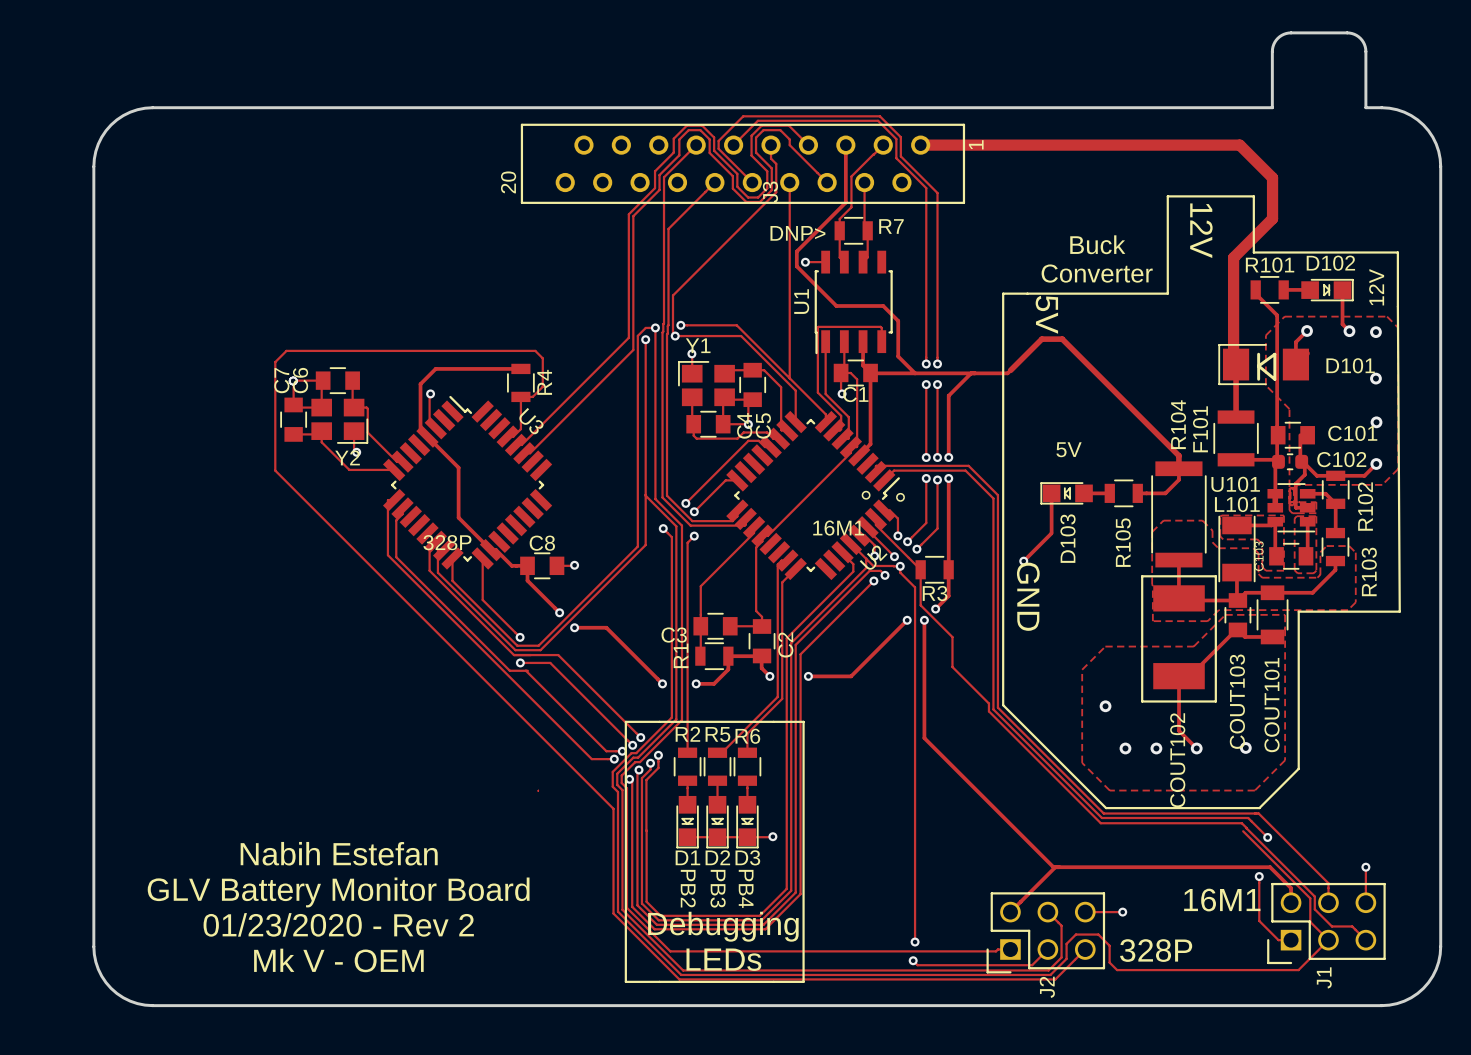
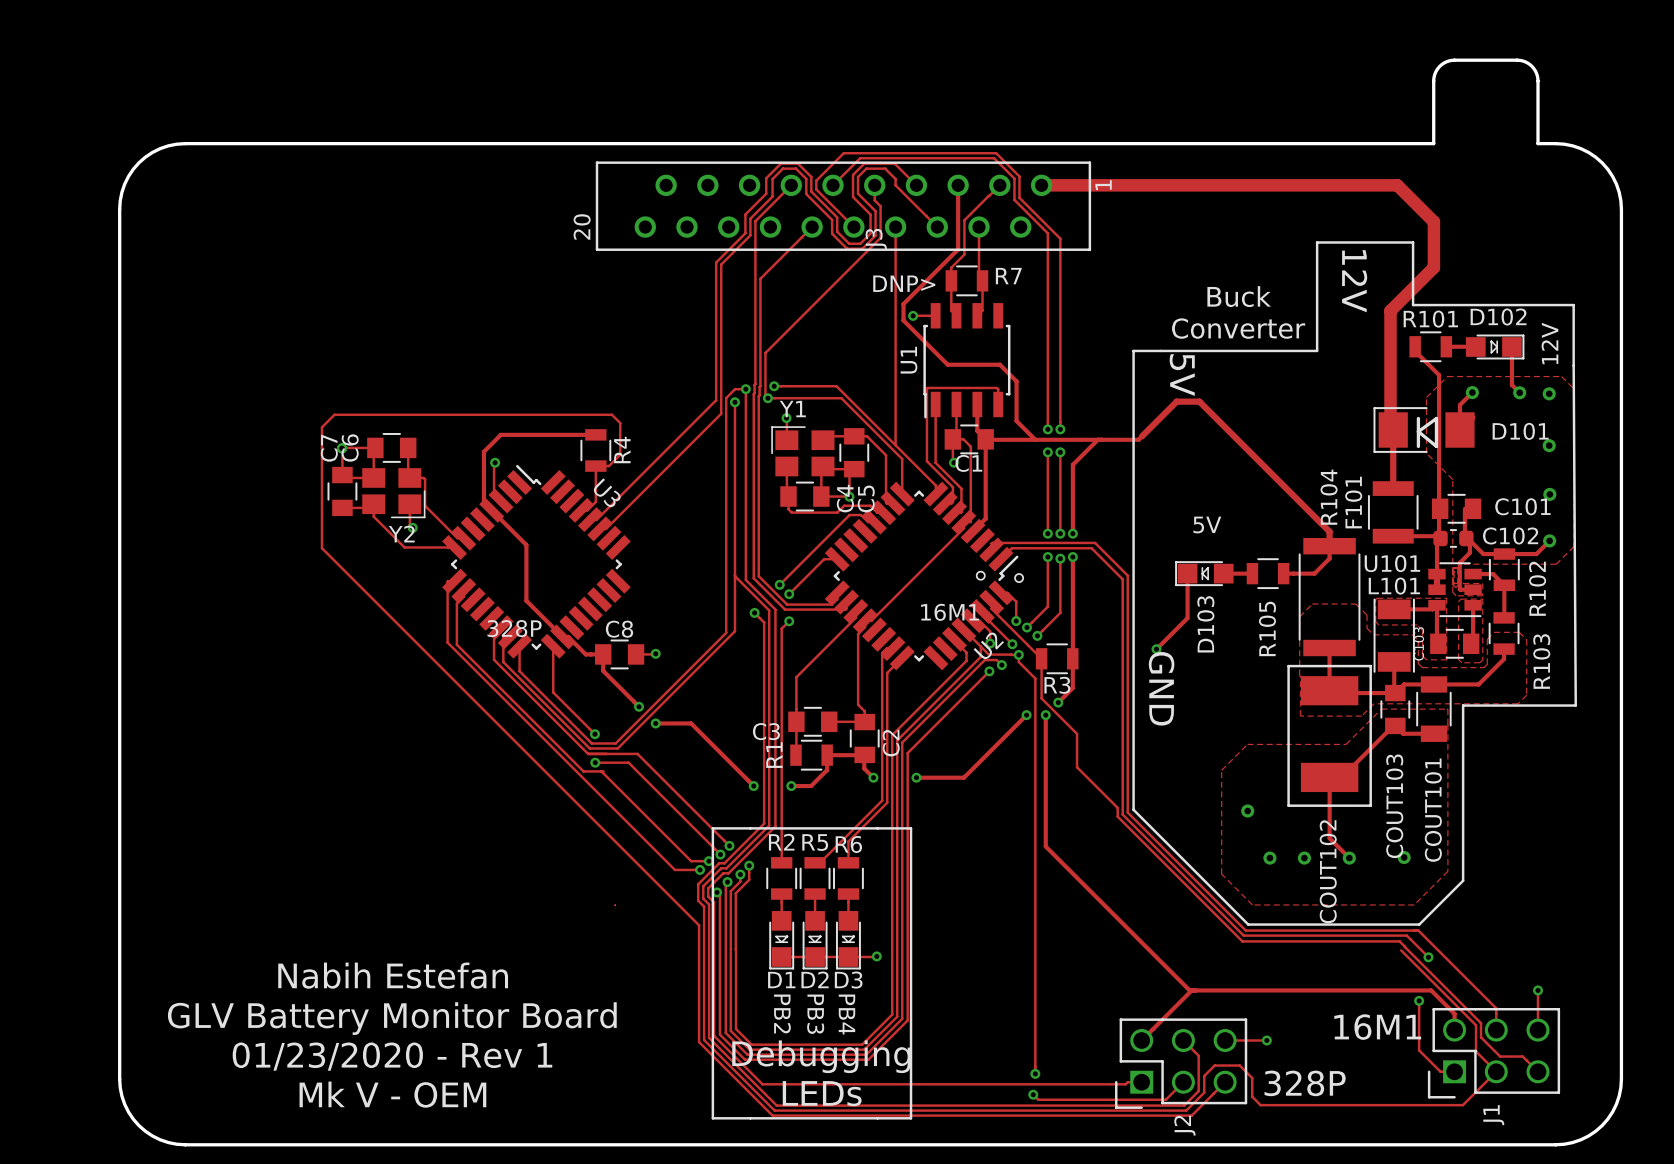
text: 01/23/2020 - Rev 2 (338, 924) -> 01/23/2020 - Rev 1 (392, 1056)

